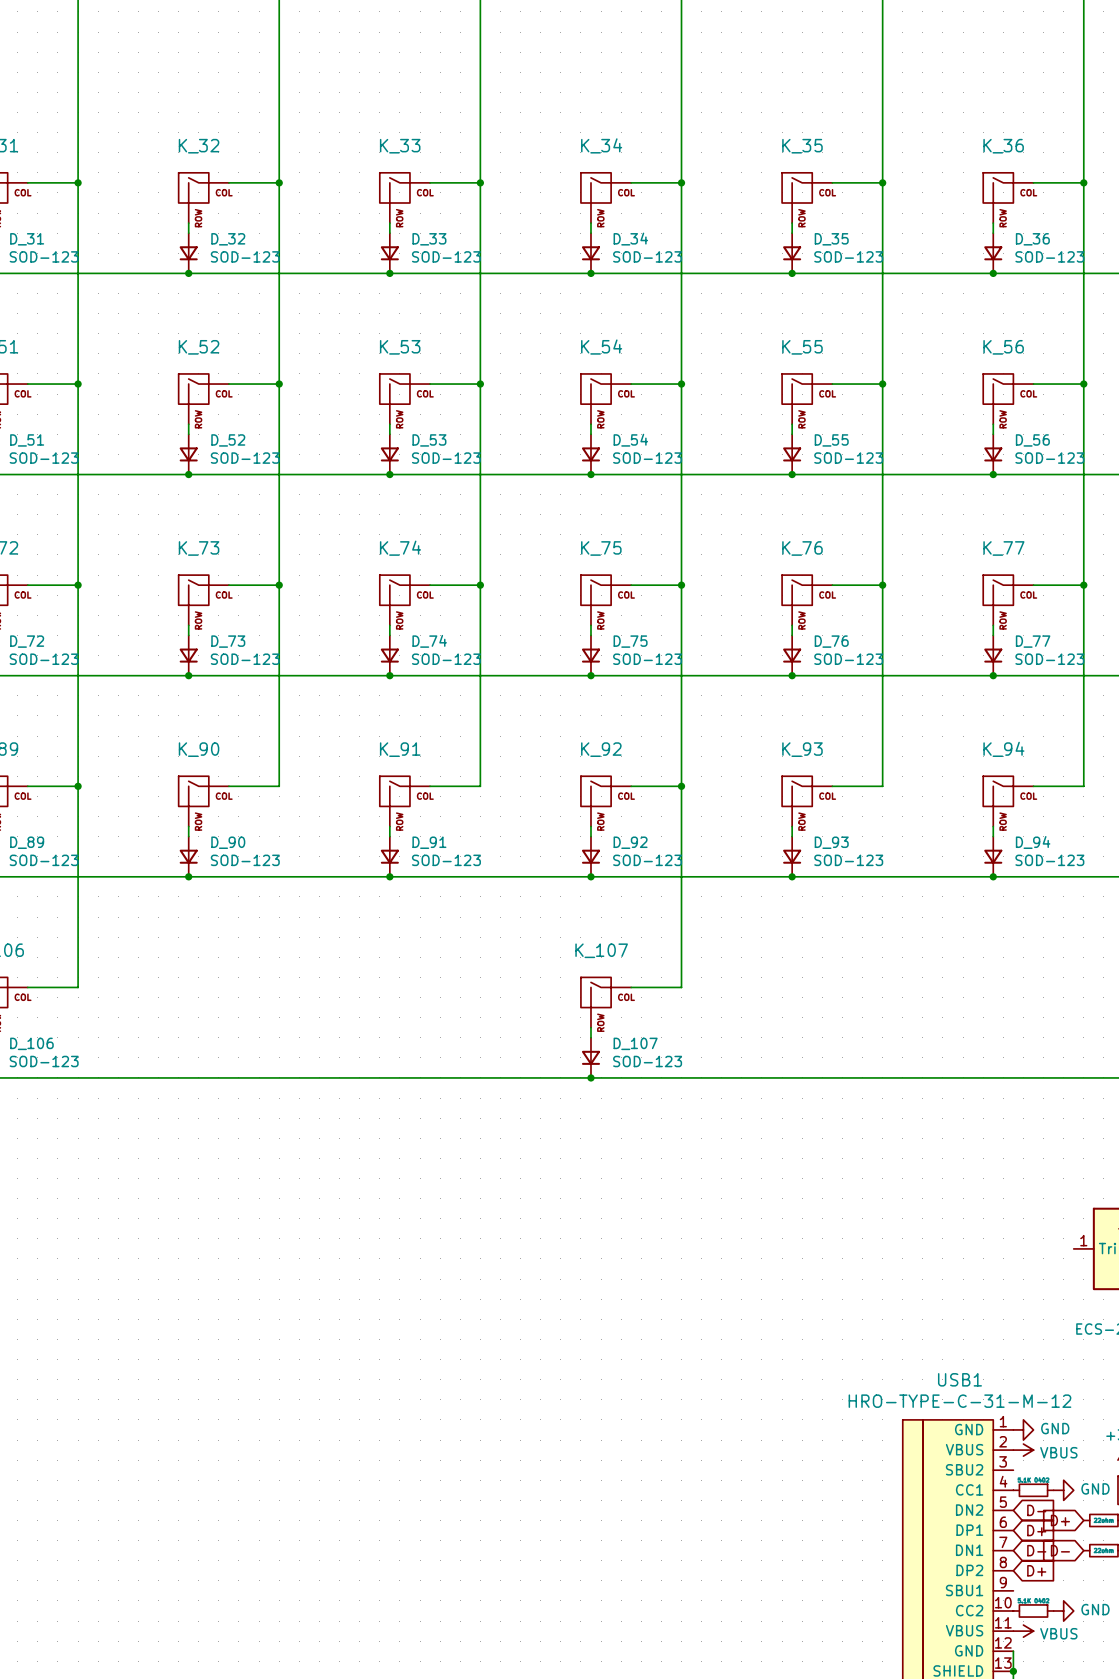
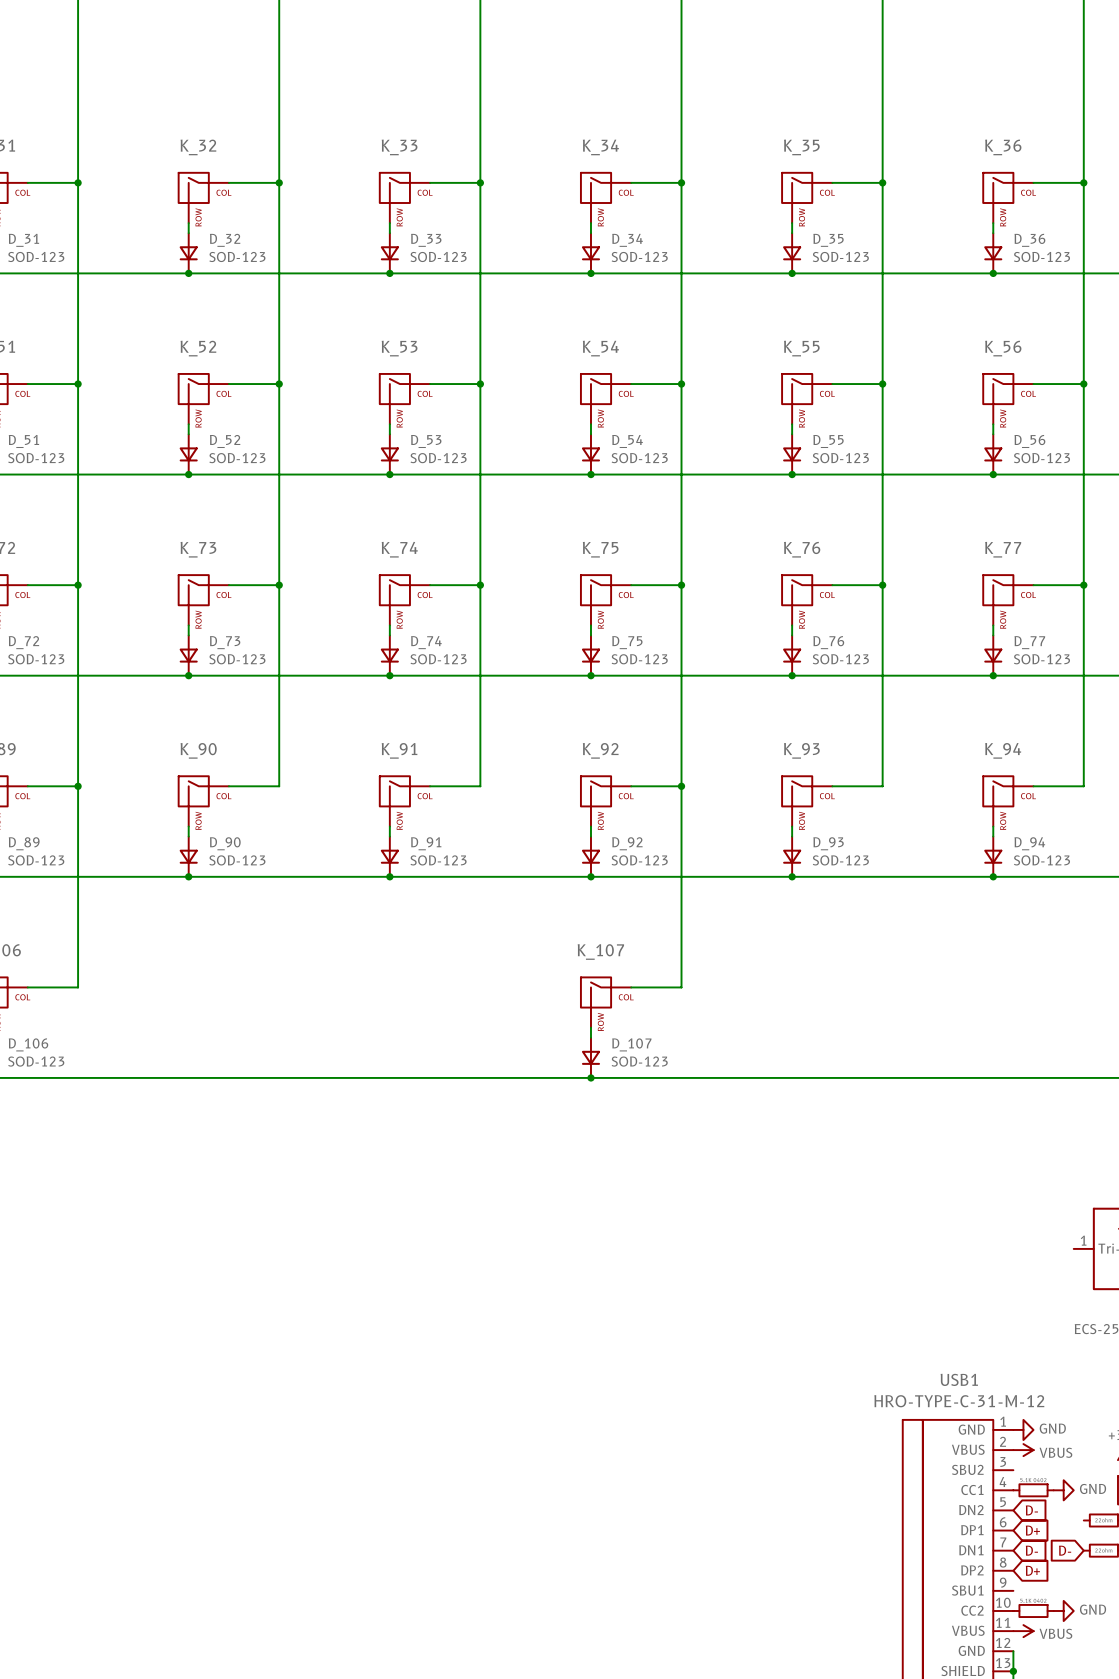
global label: D+ (1060, 1520) -> none

